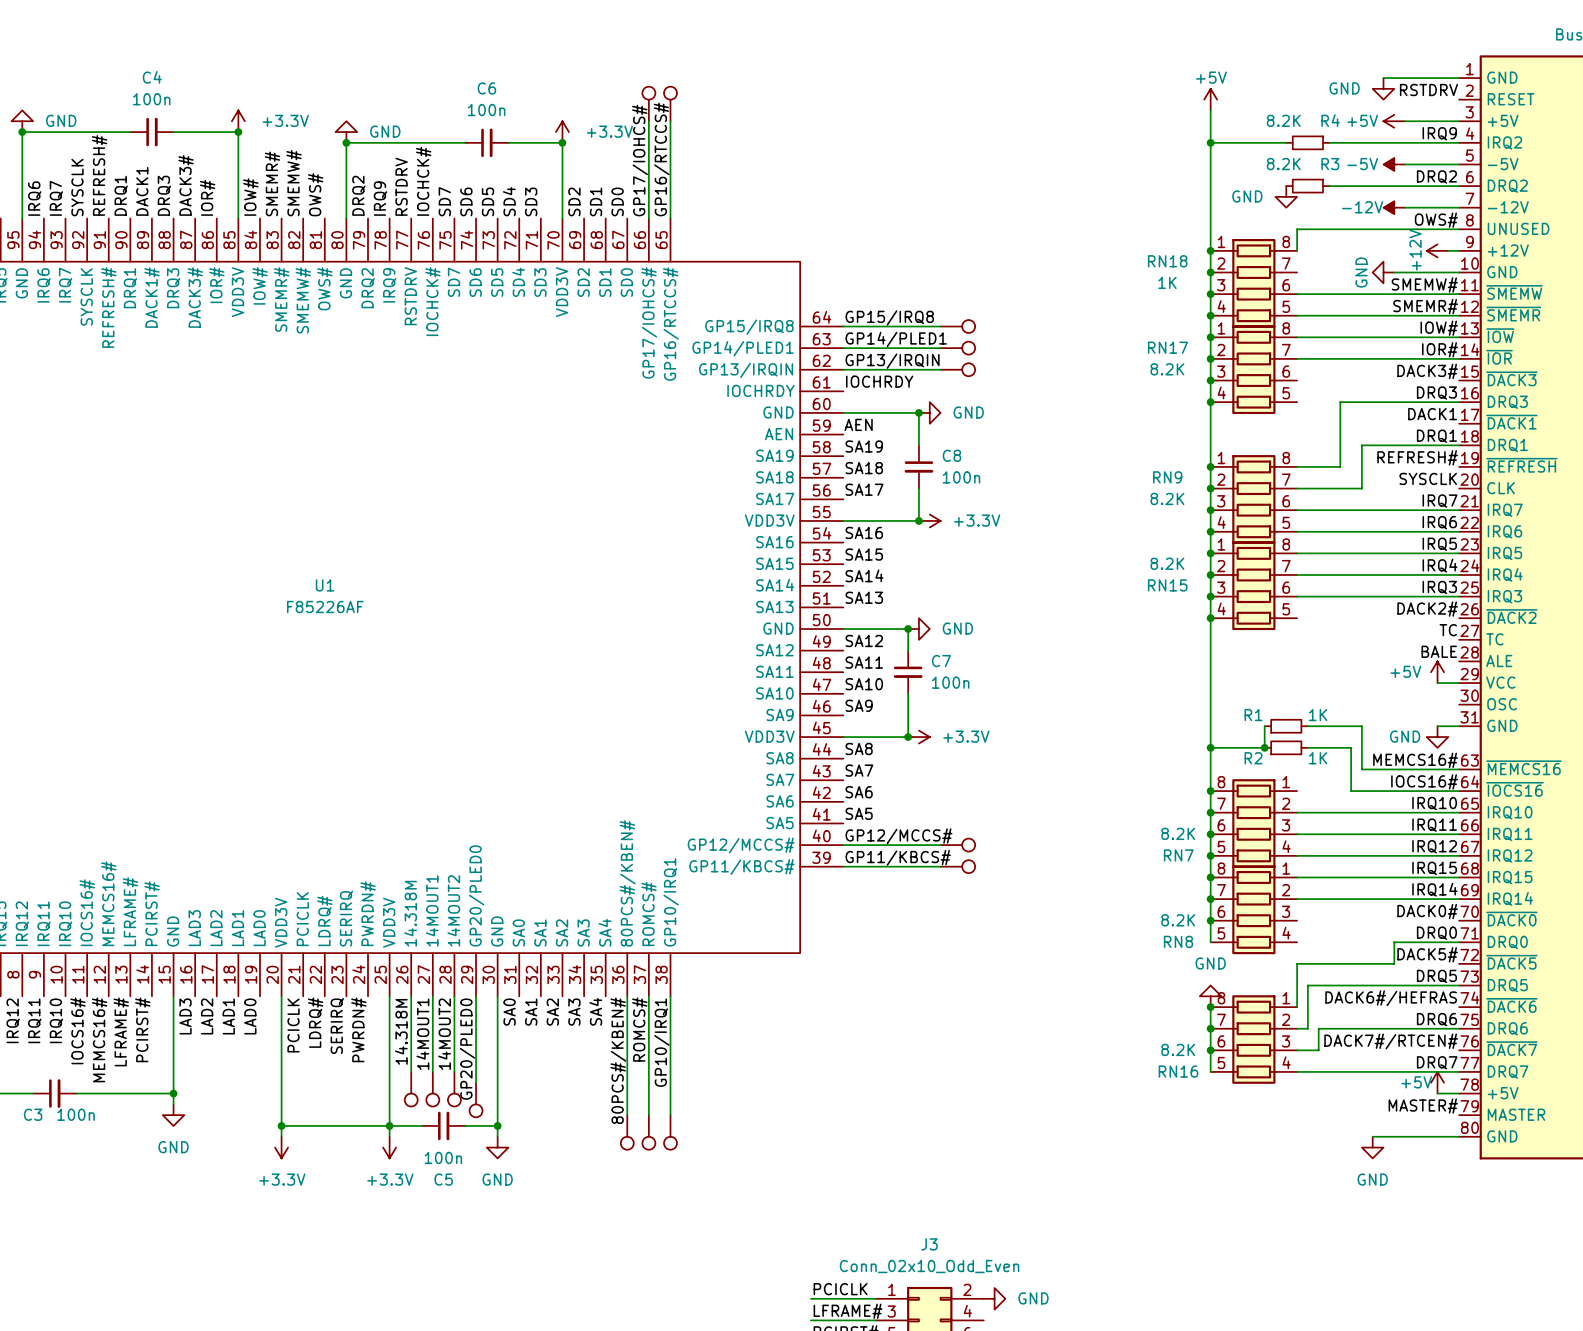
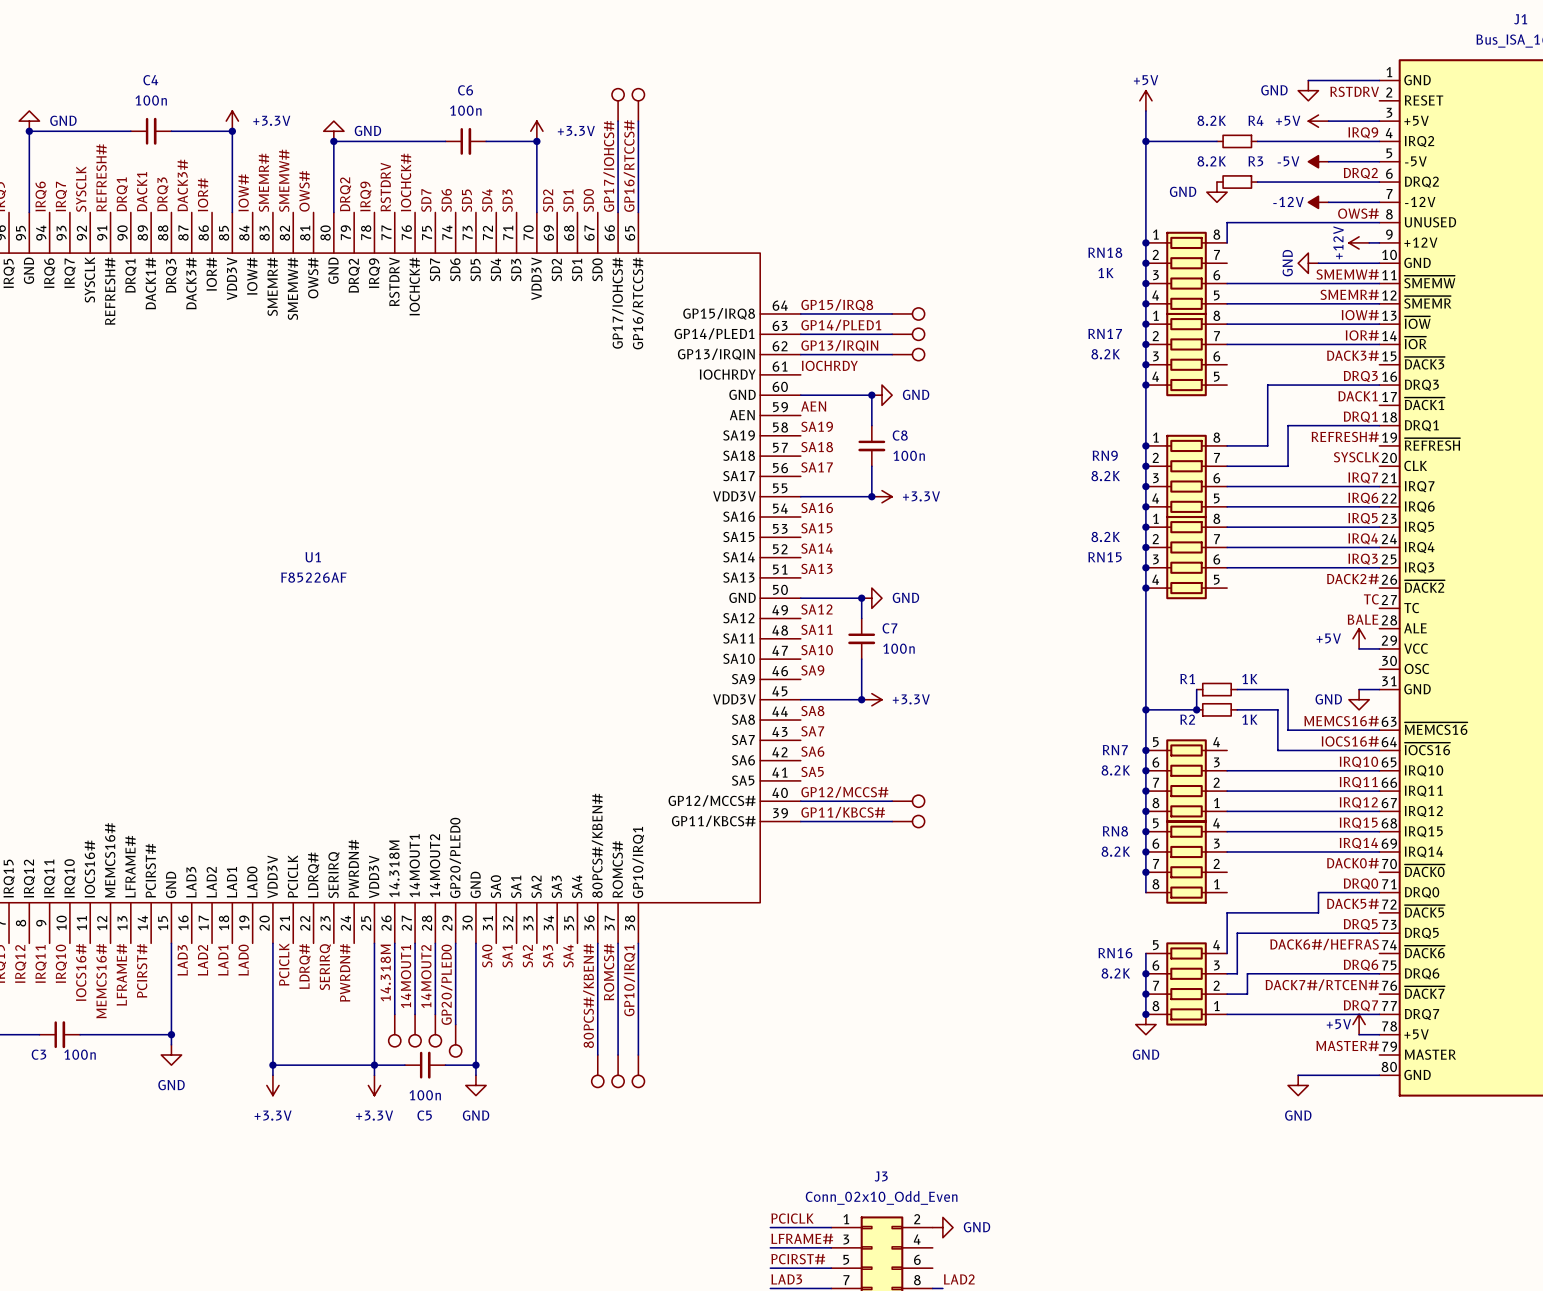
RN7 flip: as is (1253, 823) -> up-down (1186, 780)
RN8 flip: as is (1253, 909) -> up-down (1186, 862)
power symbol rotation: 0° (1210, 996) -> 180° (1145, 1024)
power symbol position: GND (1210, 996) -> GND (1145, 1024)
junction: (1210, 1007) -> none
RN16 flip: as is (1253, 1039) -> up-down (1186, 983)
junction: none -> (1145, 1014)

